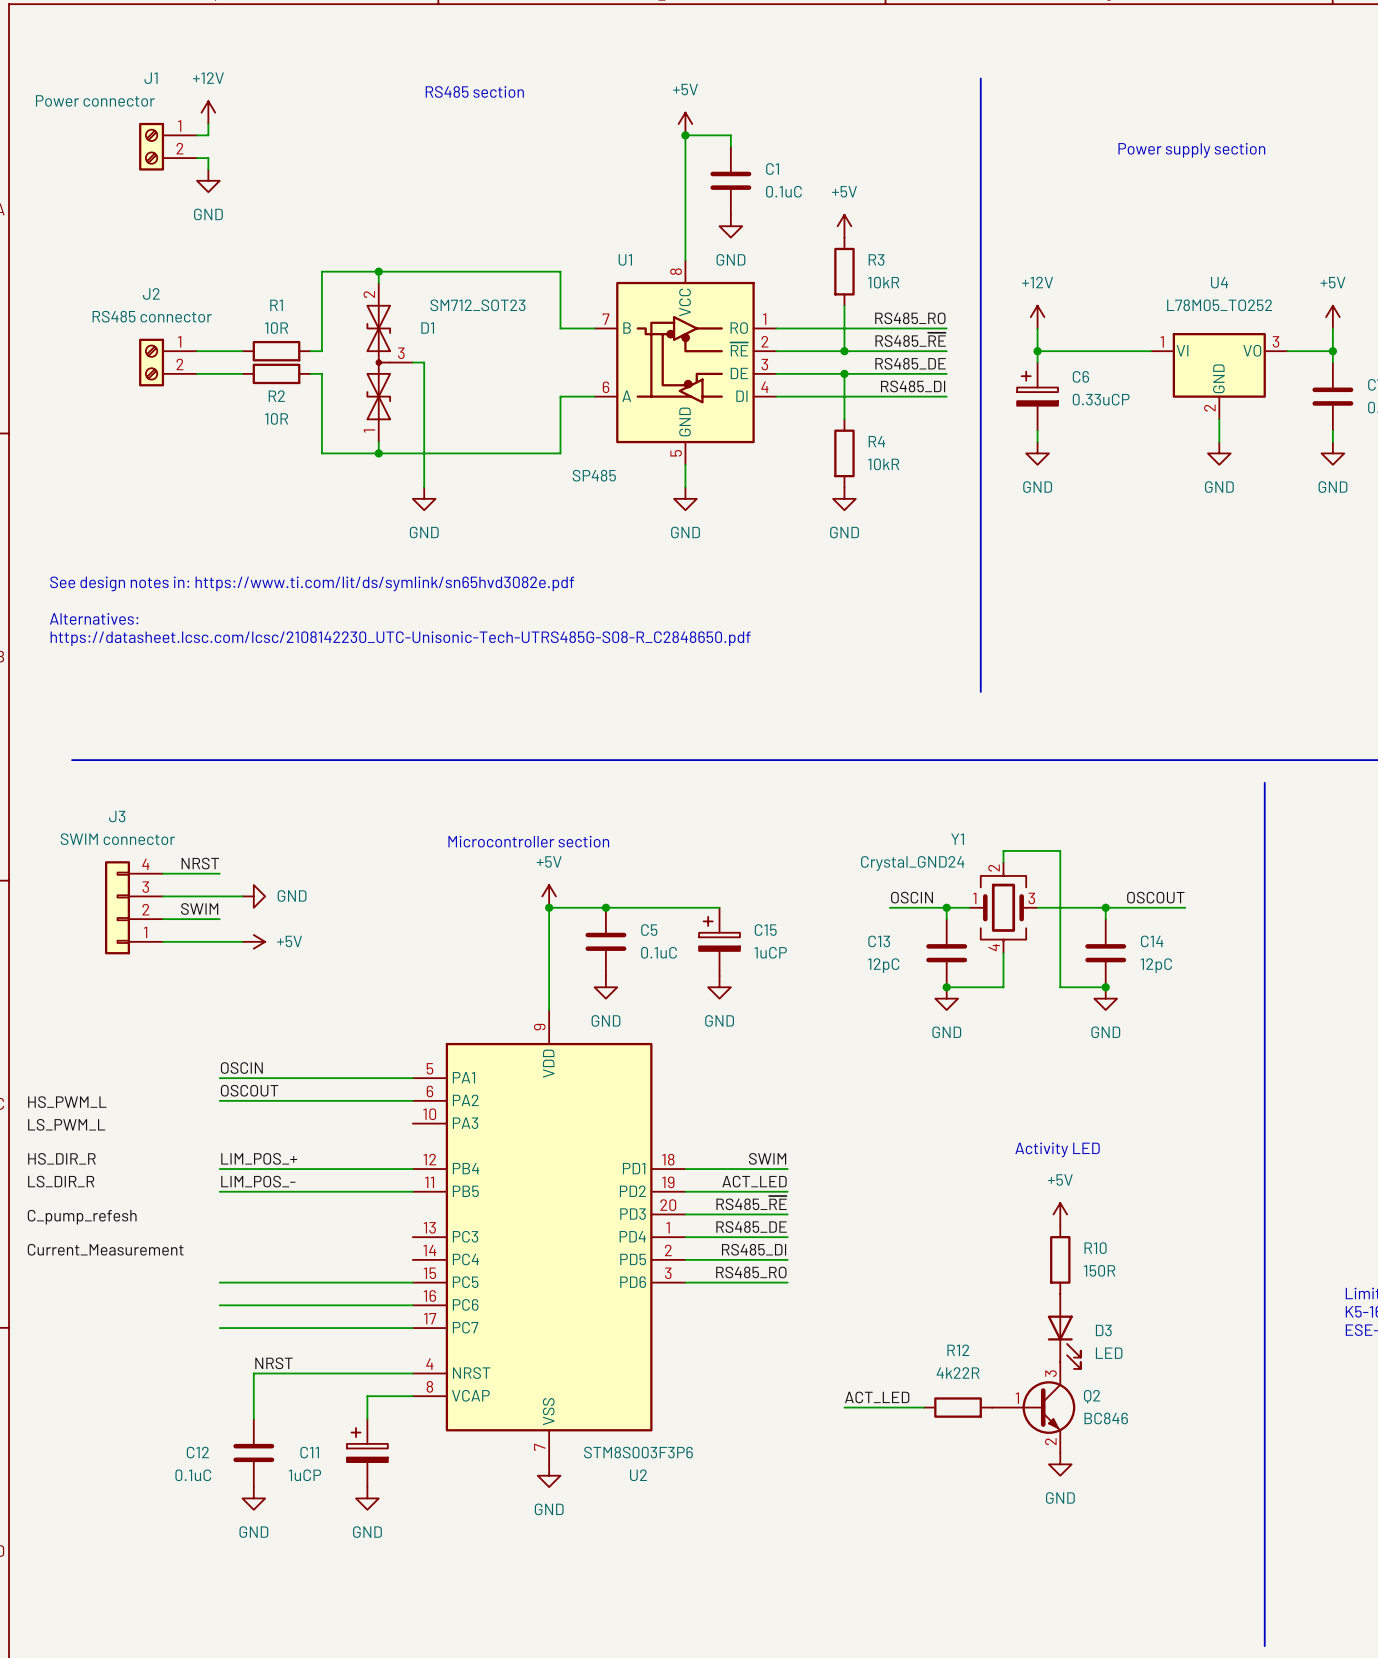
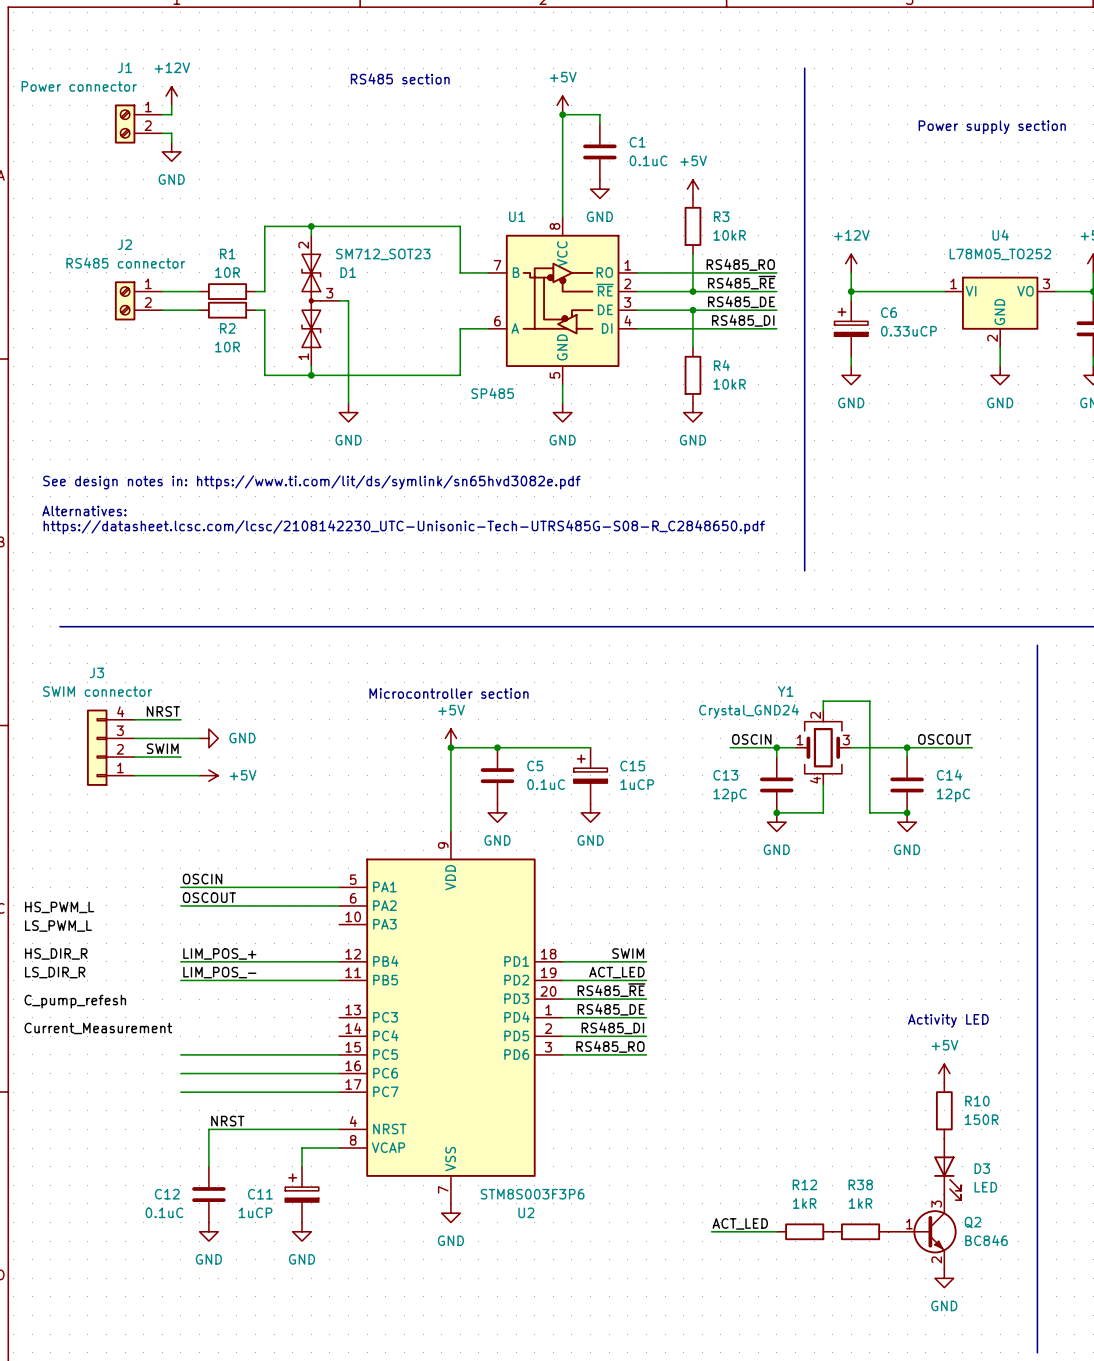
text position: Activity LED (1057, 1149) -> Activity LED (948, 1020)
power symbol position: +5V (1060, 1214) -> +5V (944, 1073)
R10 position: (1060, 1259) -> (944, 1110)
D3 position: (1064, 1331) -> (947, 1169)
R12 value: 4k22R (958, 1372) -> 1kR (804, 1203)
label position: ACT_LED (877, 1397) -> ACT_LED (740, 1223)
wire: (844, 1407) (923, 1407) -> (711, 1231) (776, 1231)
R12 position: (958, 1407) -> (804, 1231)
Q2 position: (1033, 1407) -> (922, 1231)
power symbol position: GND (1060, 1464) -> GND (944, 1278)
R38: none -> 1kR (860, 1231)

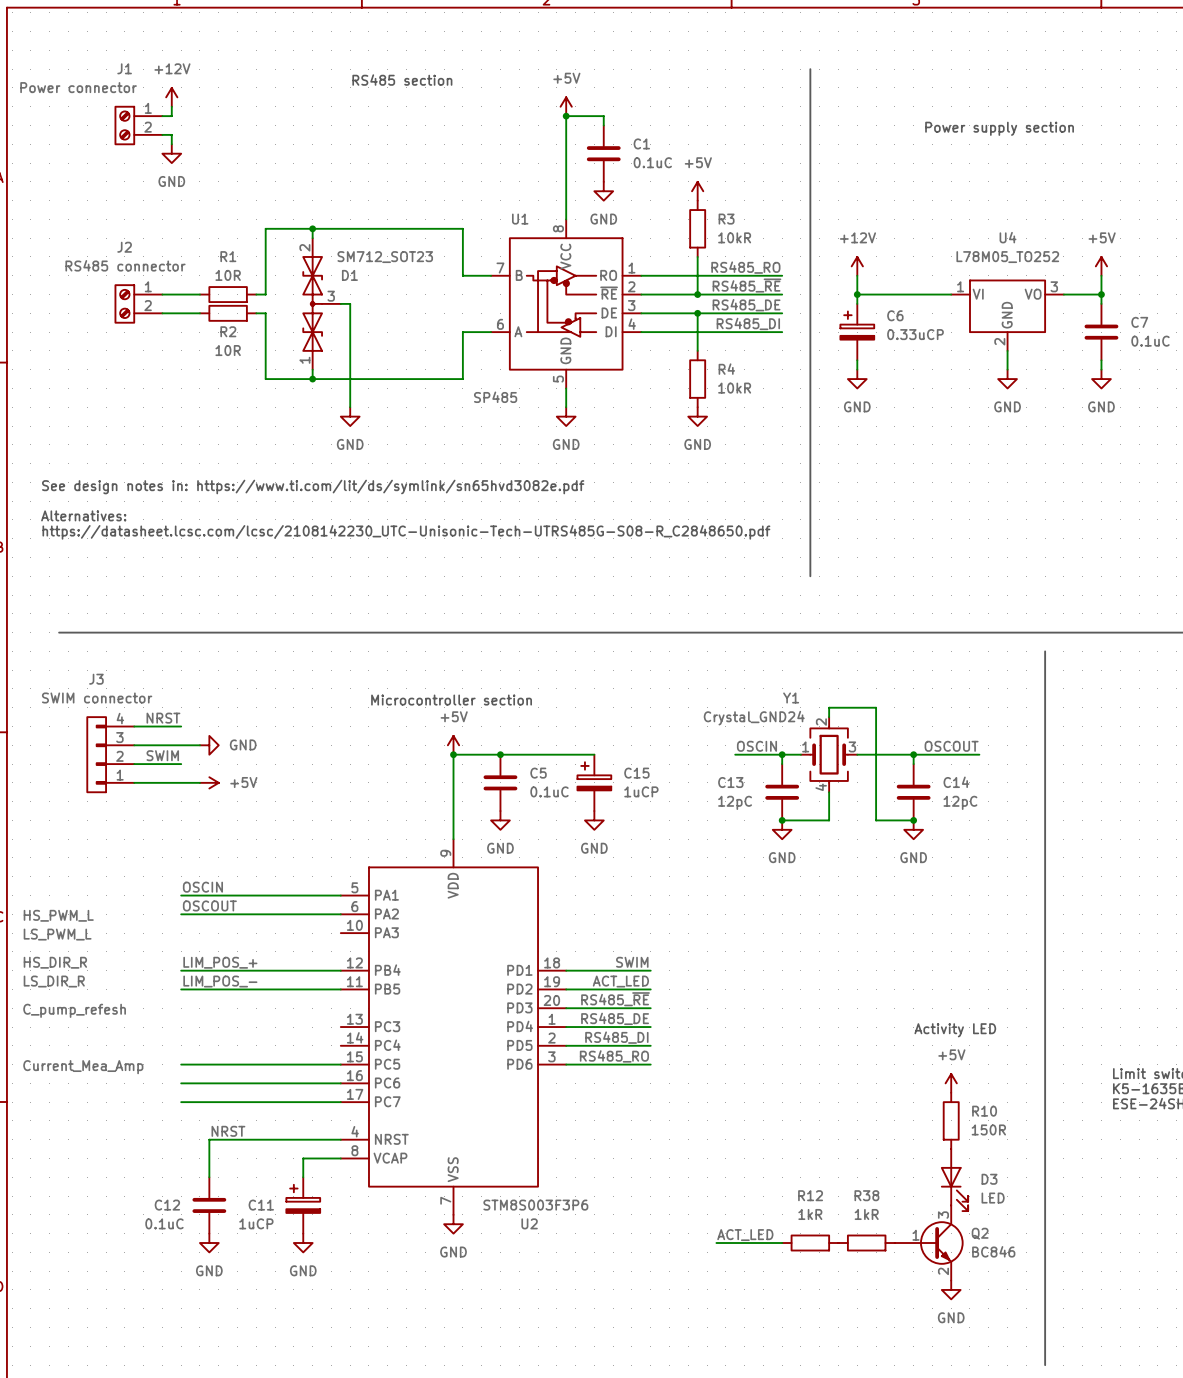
label: Current_Measurement (98, 1028) -> none
label: none -> Current_Mea_Amp (83, 1067)

